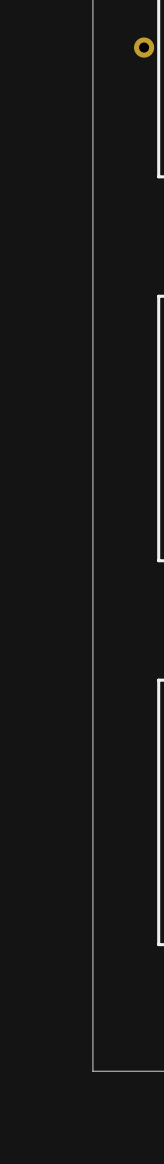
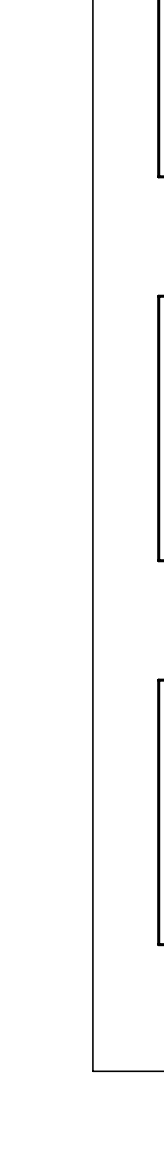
via: (144, 47) -> none

